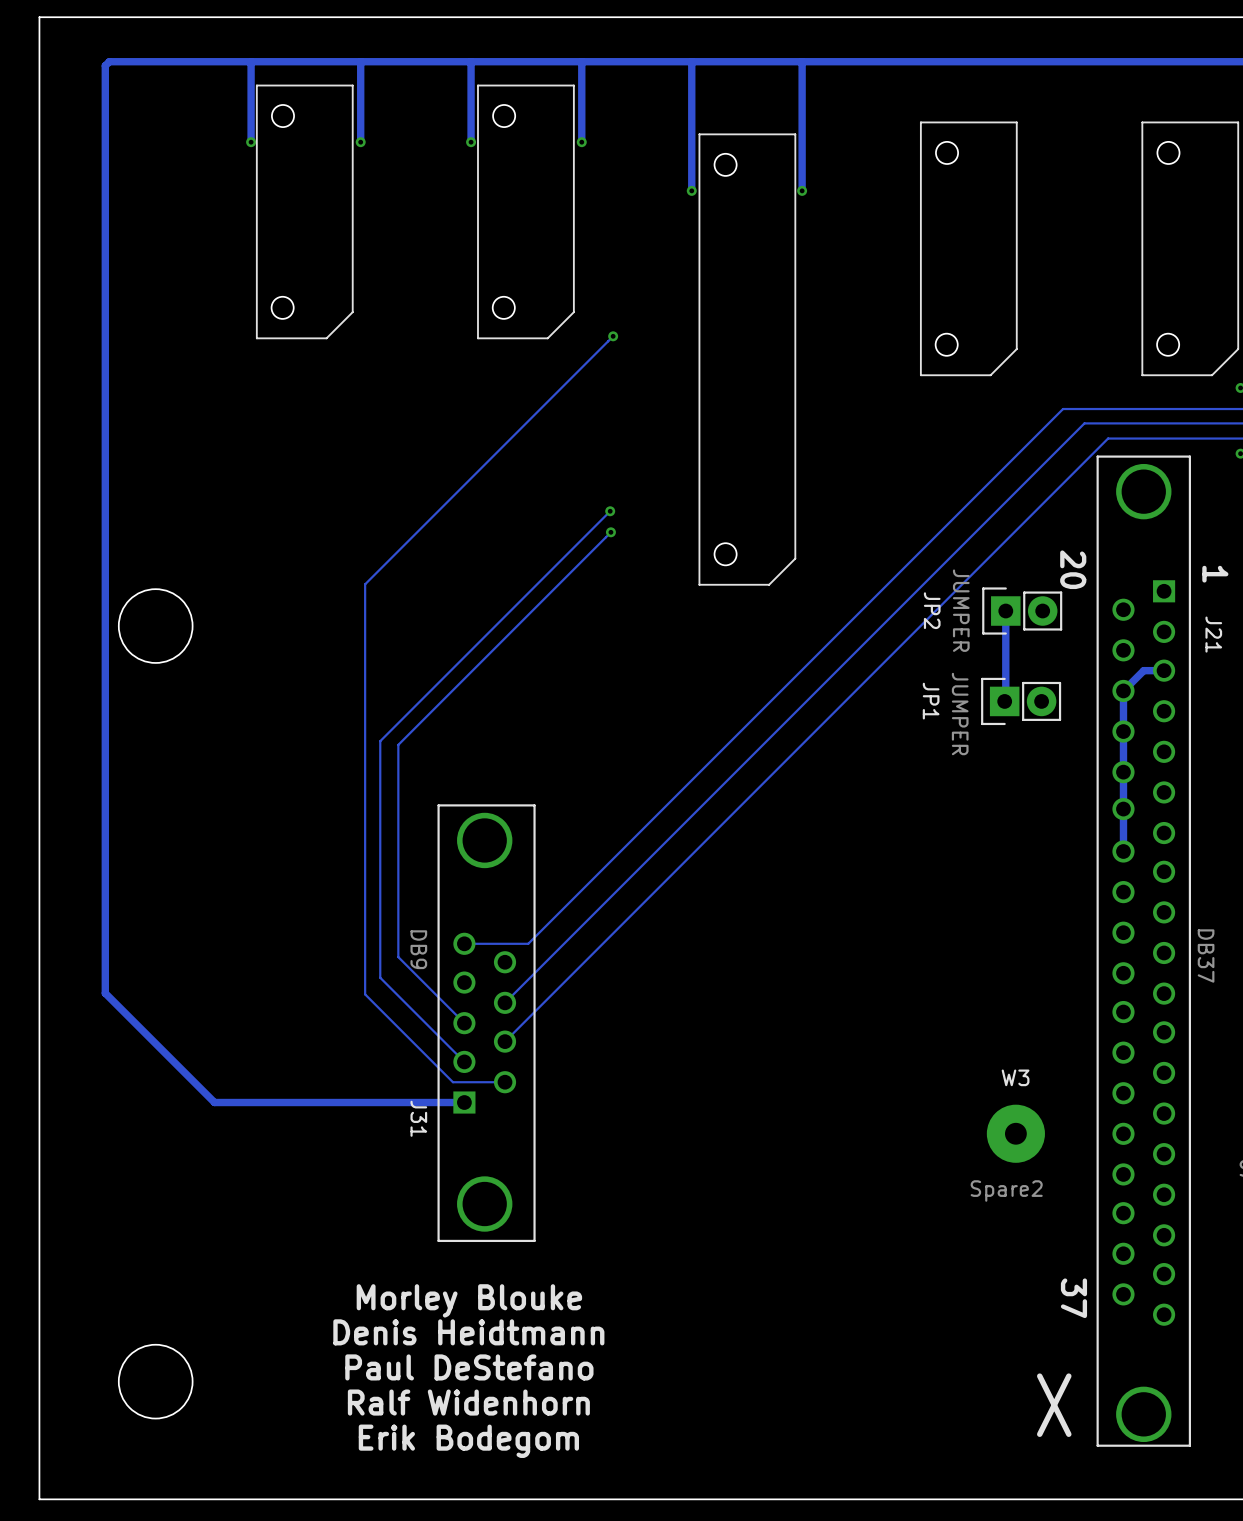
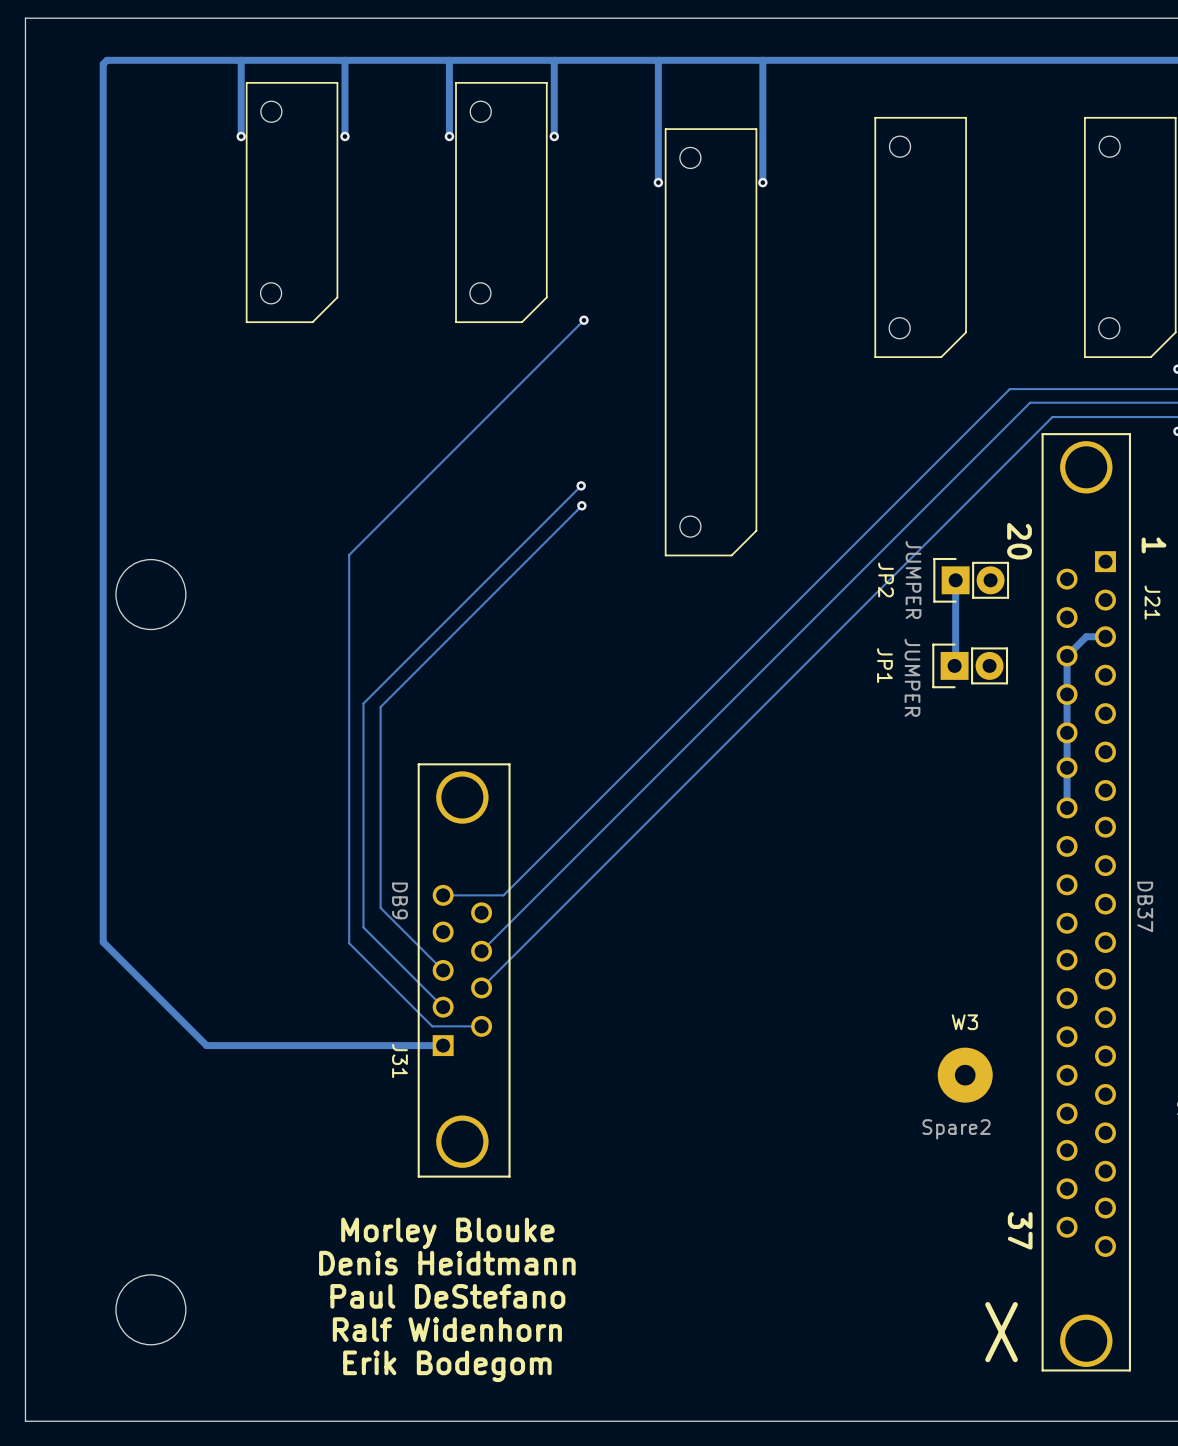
board edge: (39, 17) (39, 1499) -> (40, 18) (25, 18) (25, 1421) (40, 1421)

